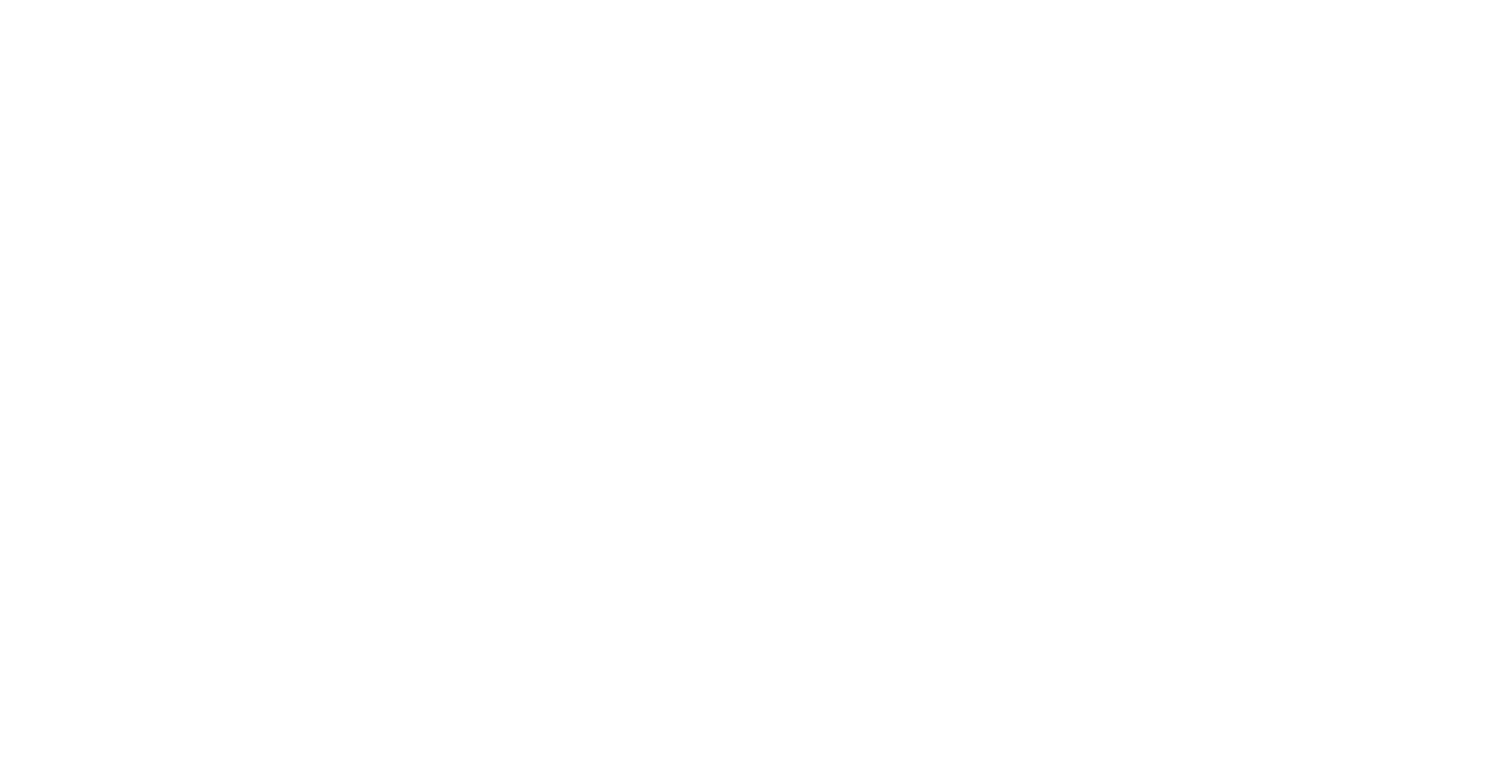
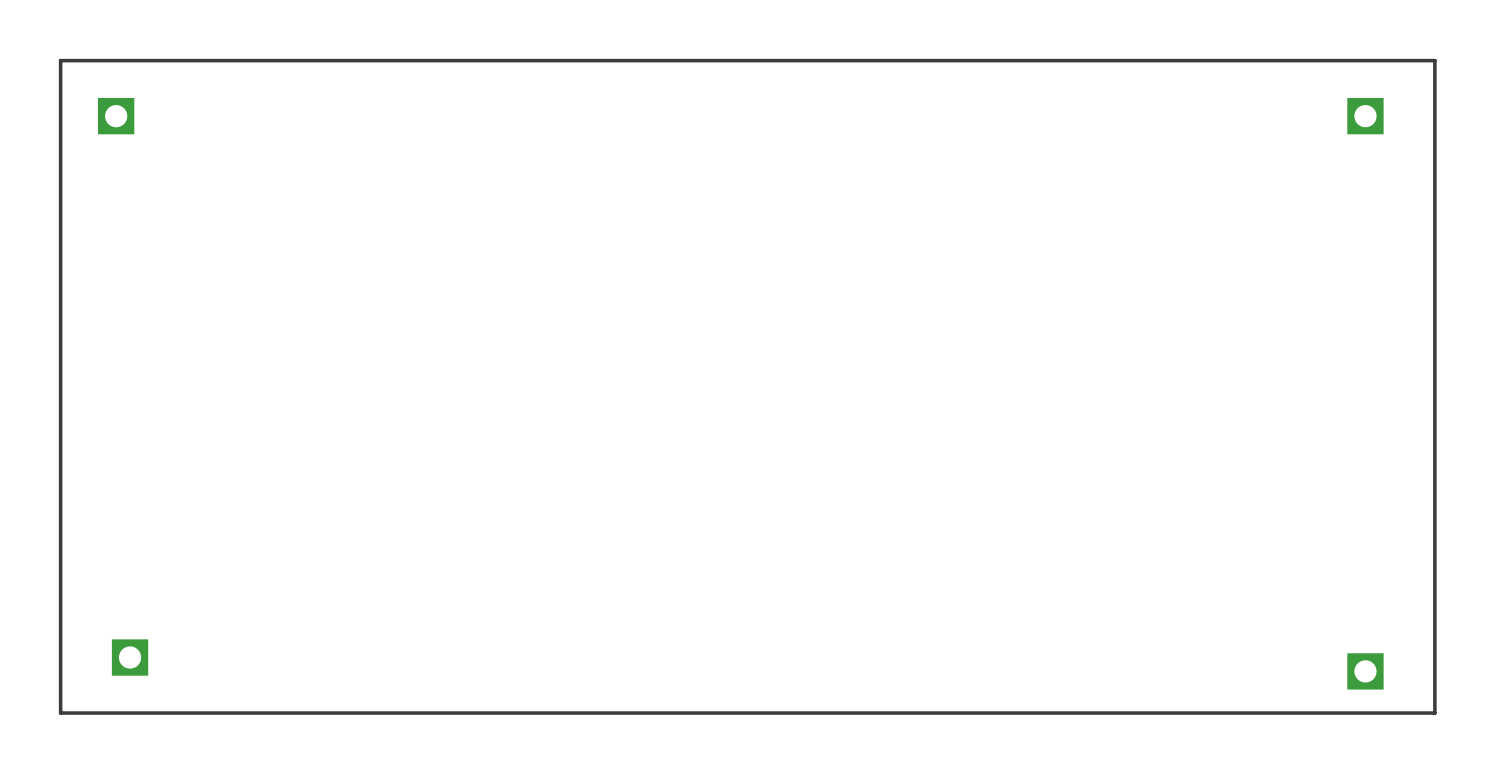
part: none -> (747, 386)

